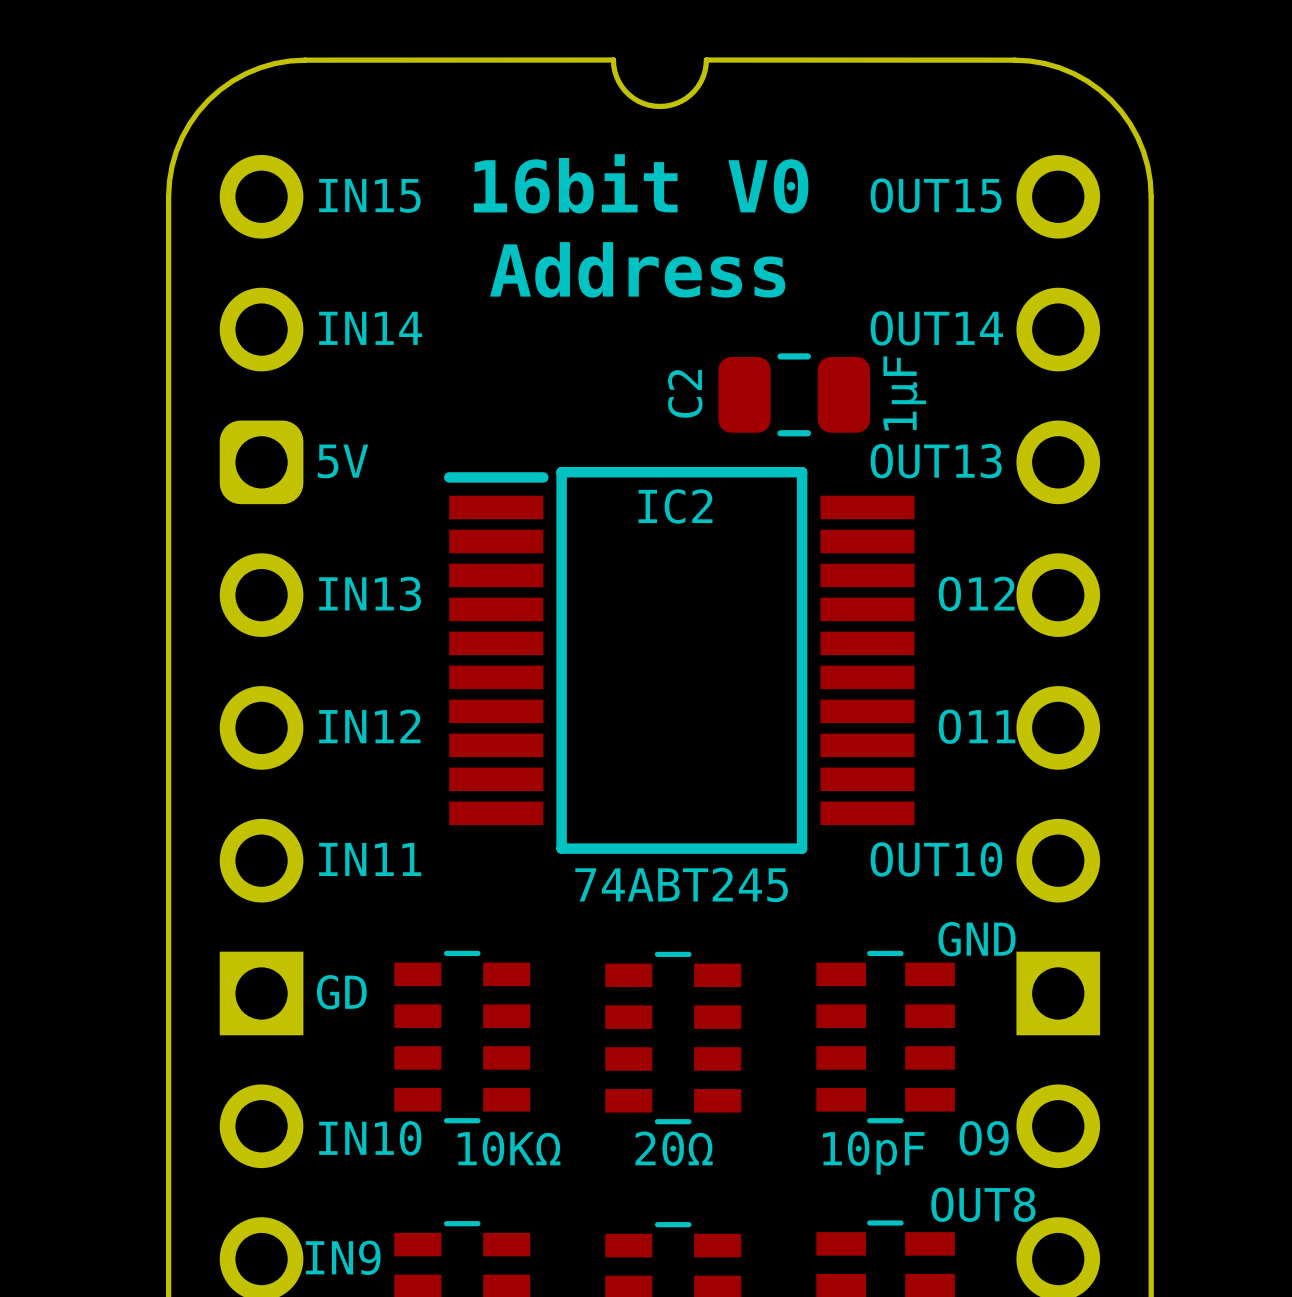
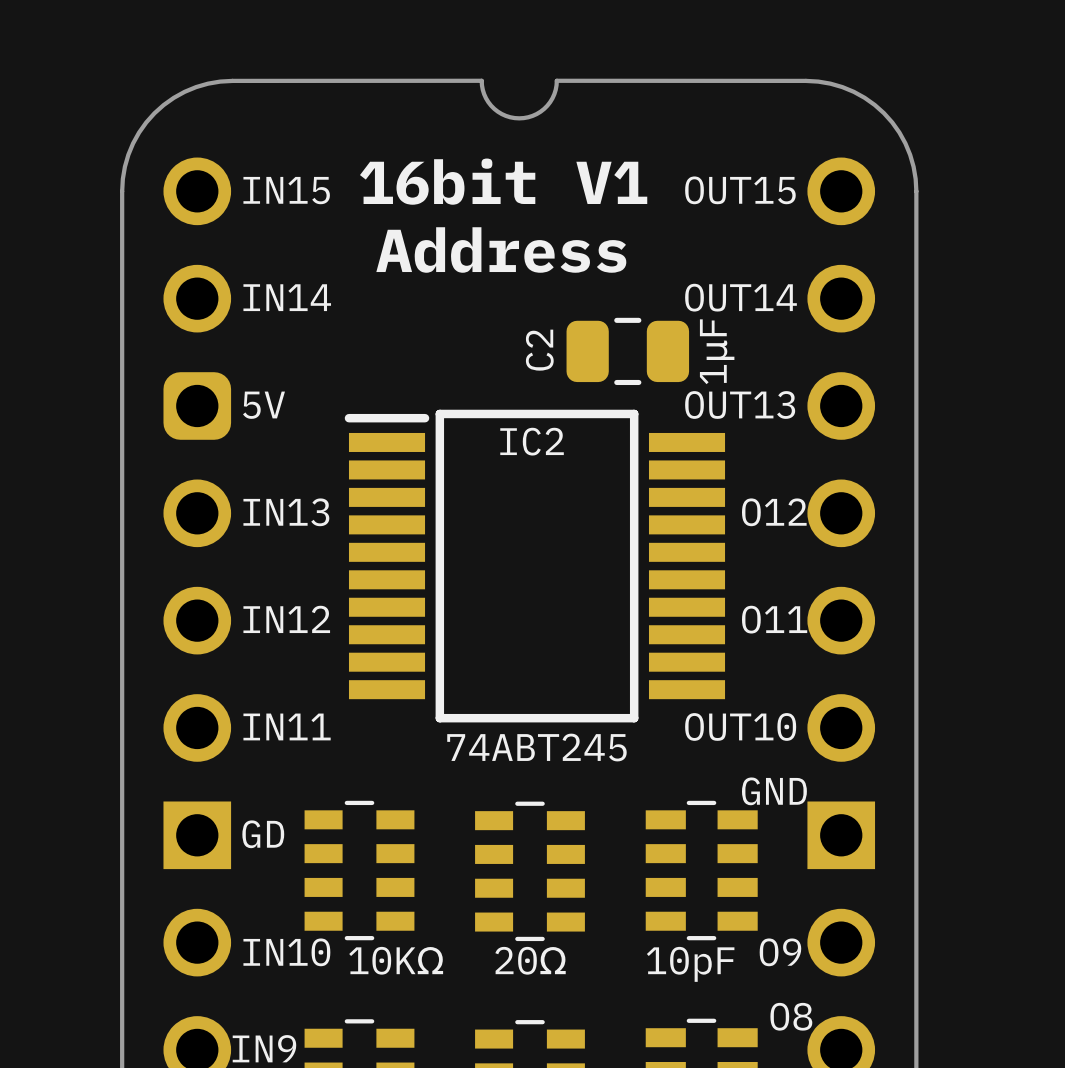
text: 16bit V0 (641, 183) -> 16bit V1 (503, 181)
text: OUT8 (983, 1204) -> O8 (791, 1016)

